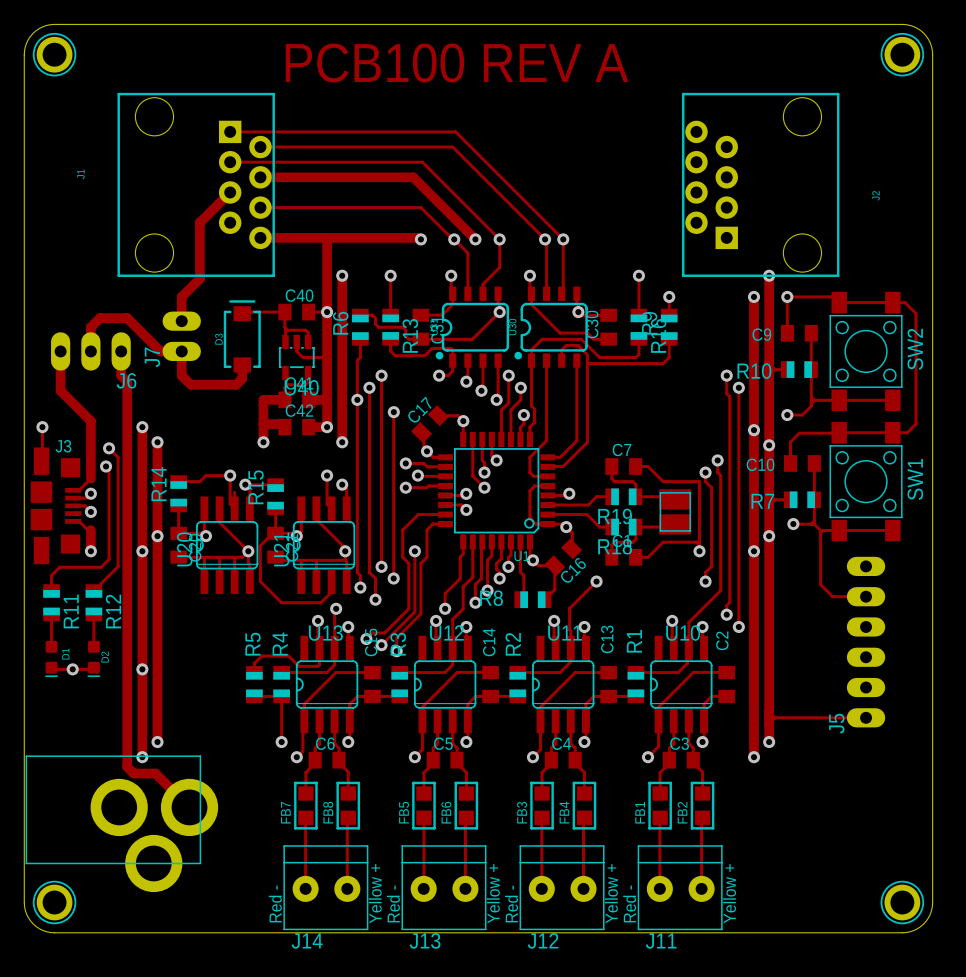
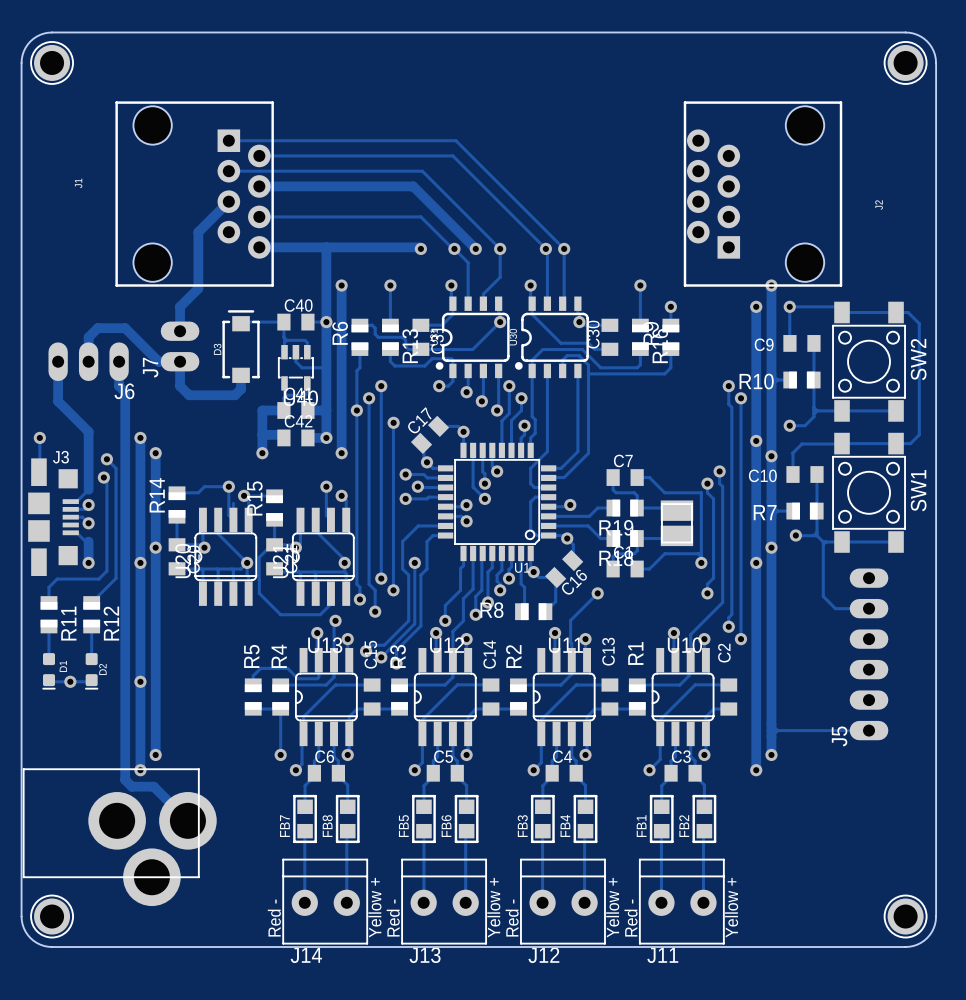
text: PCB100 REV A (457, 63) -> none

